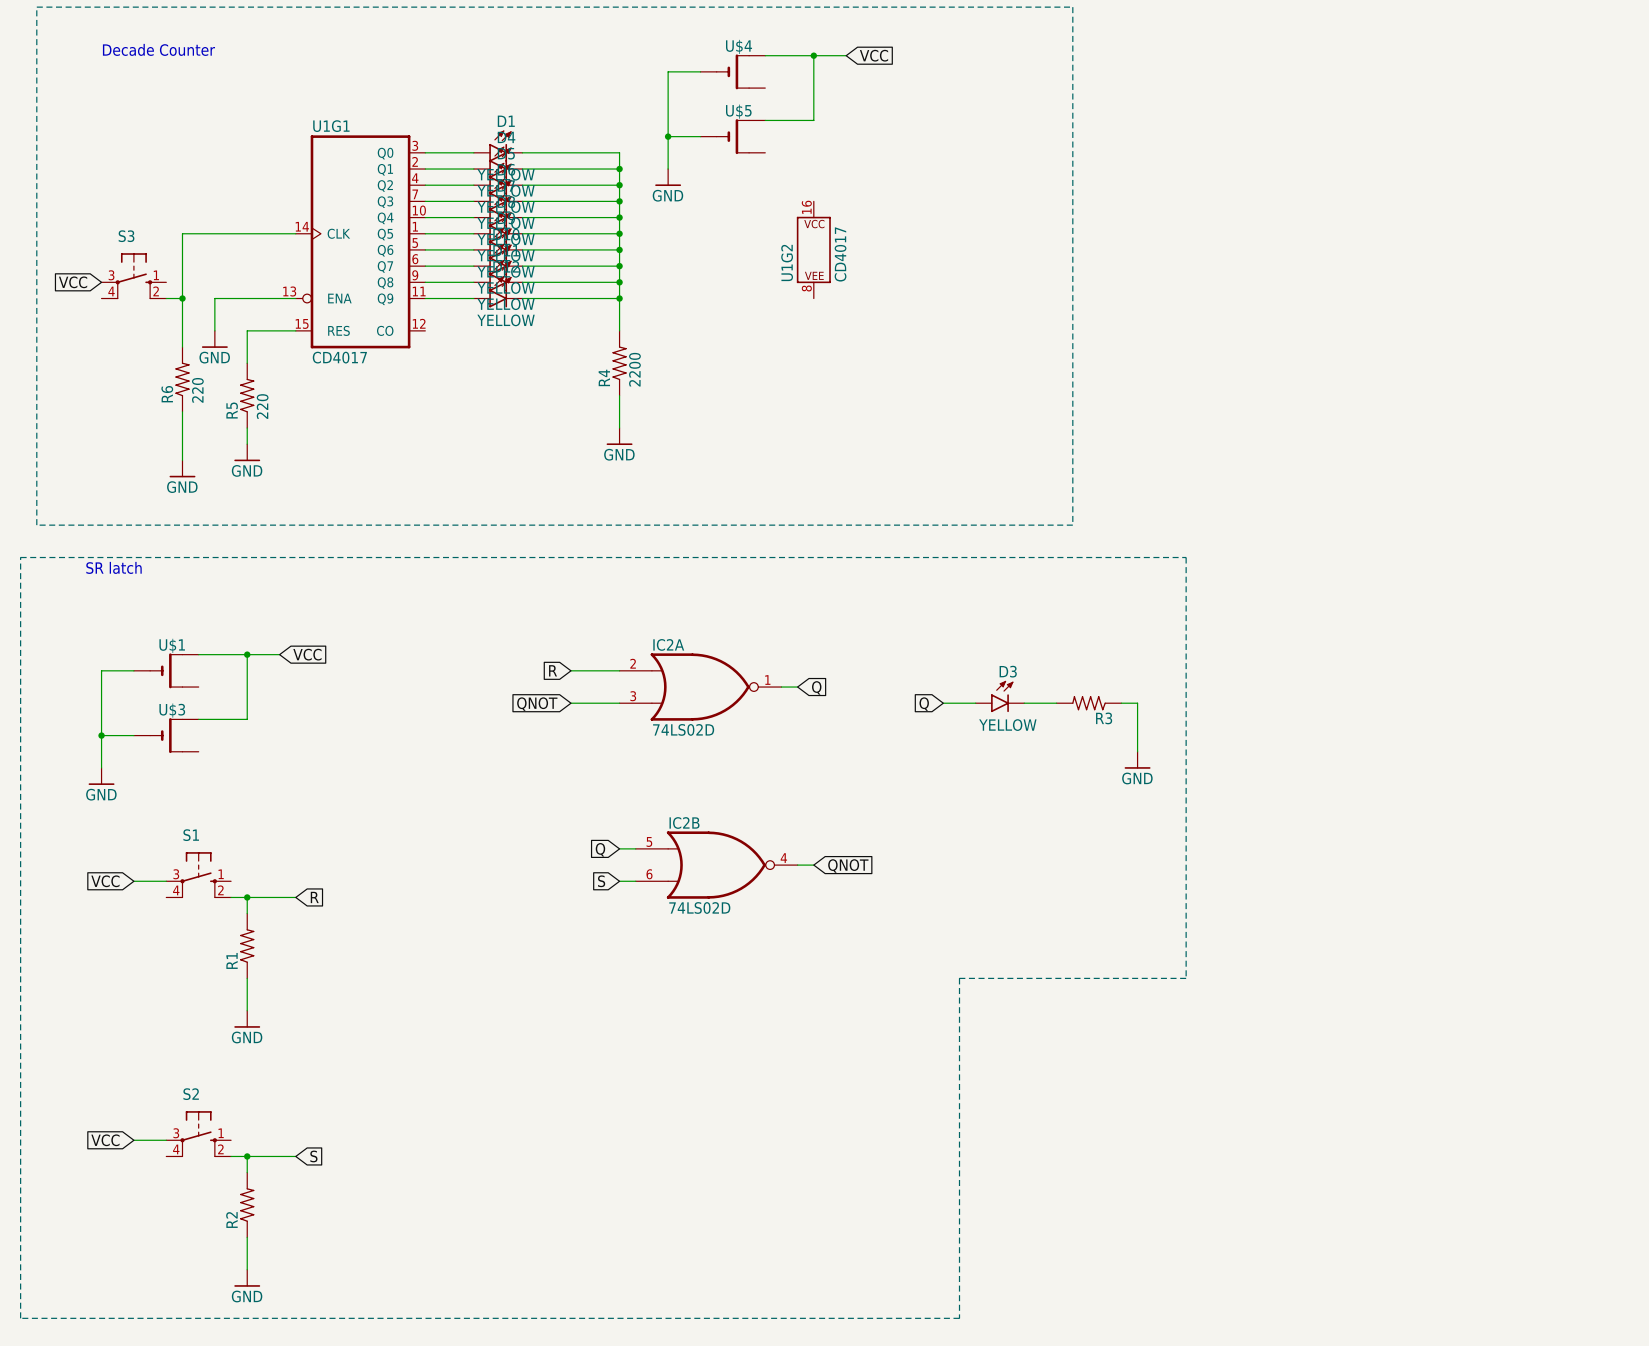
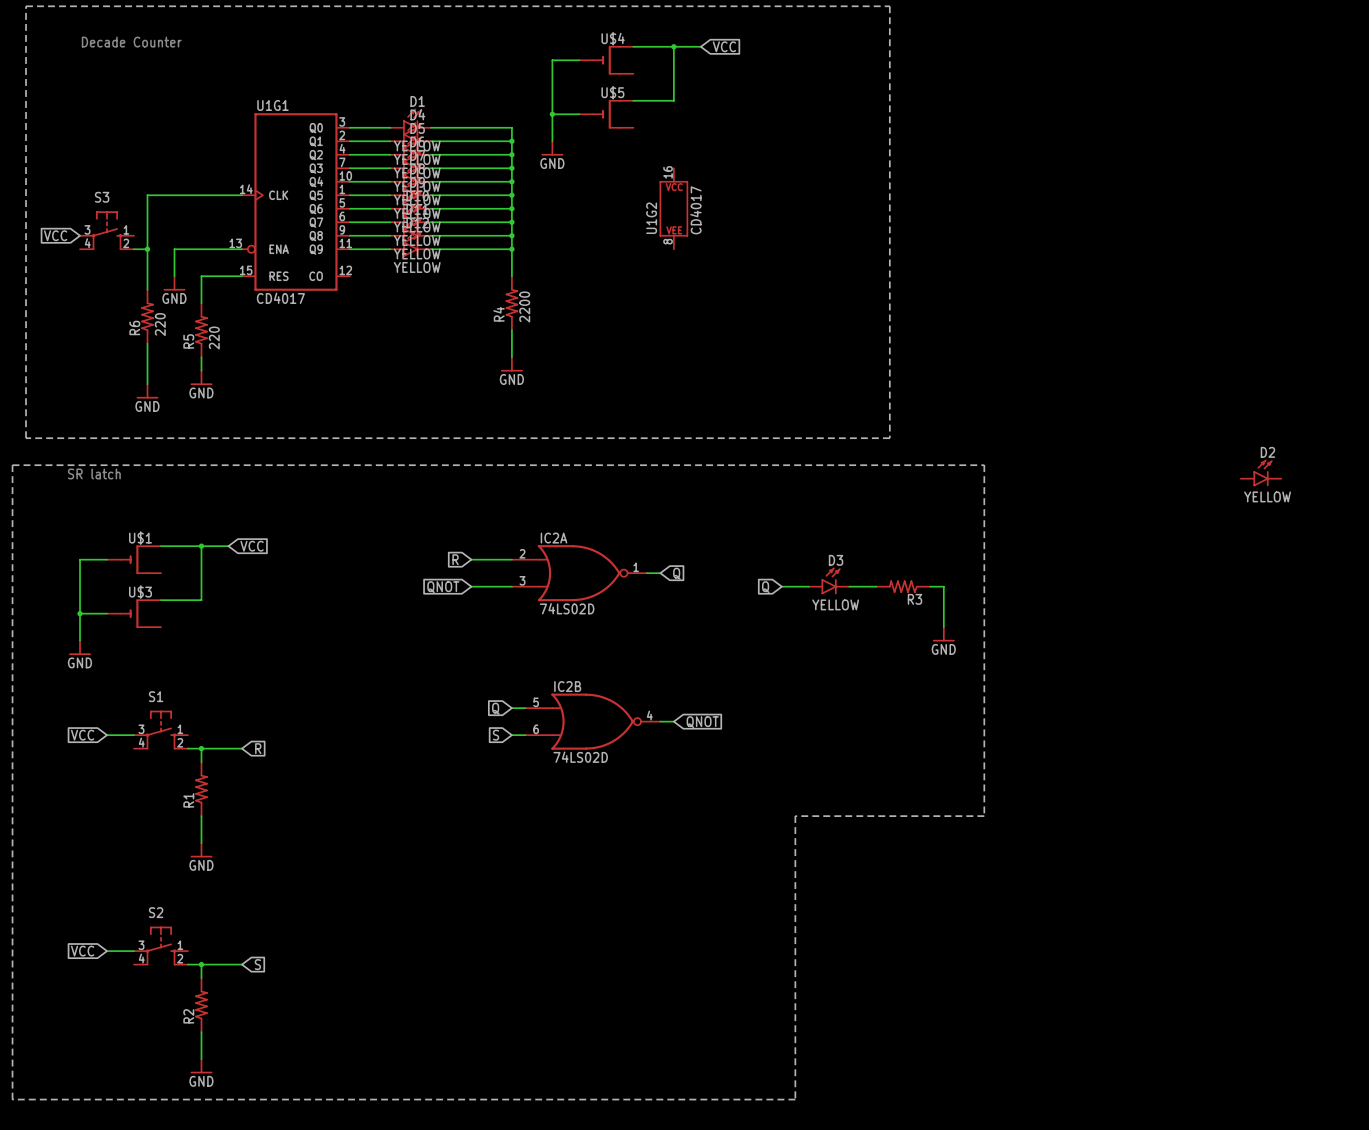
D2: none -> YELLOW (1261, 473)

